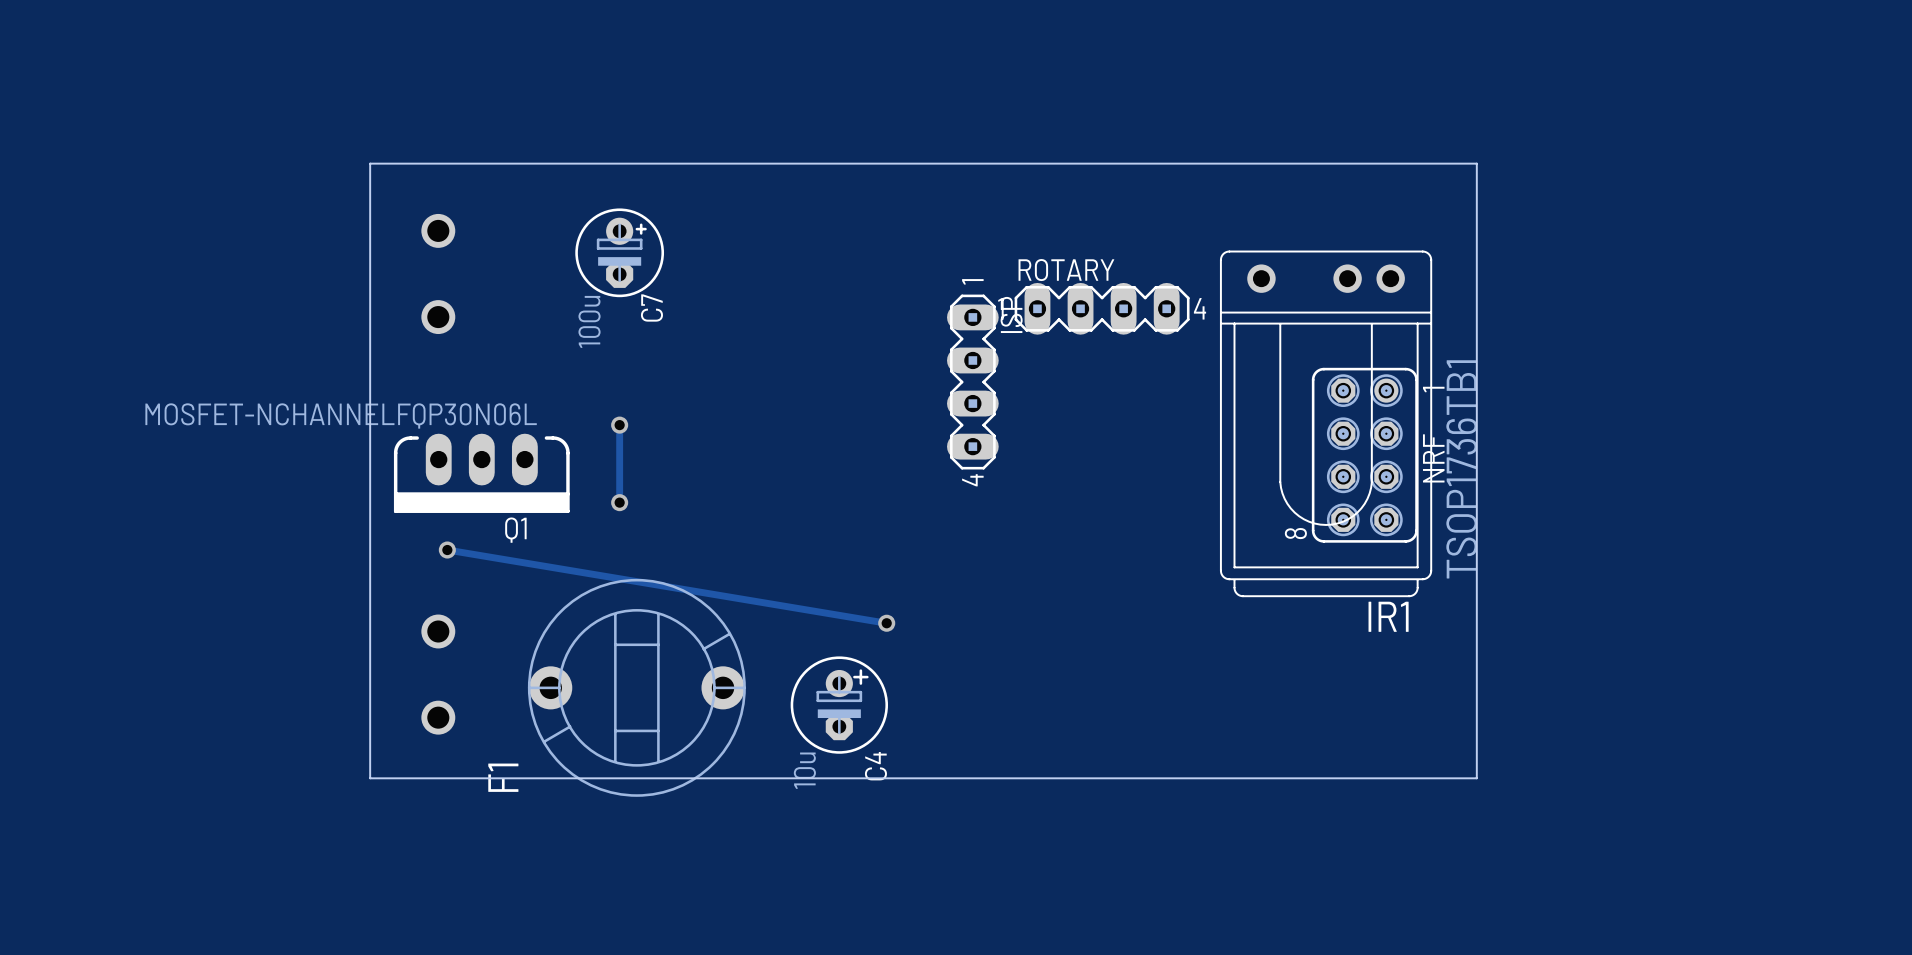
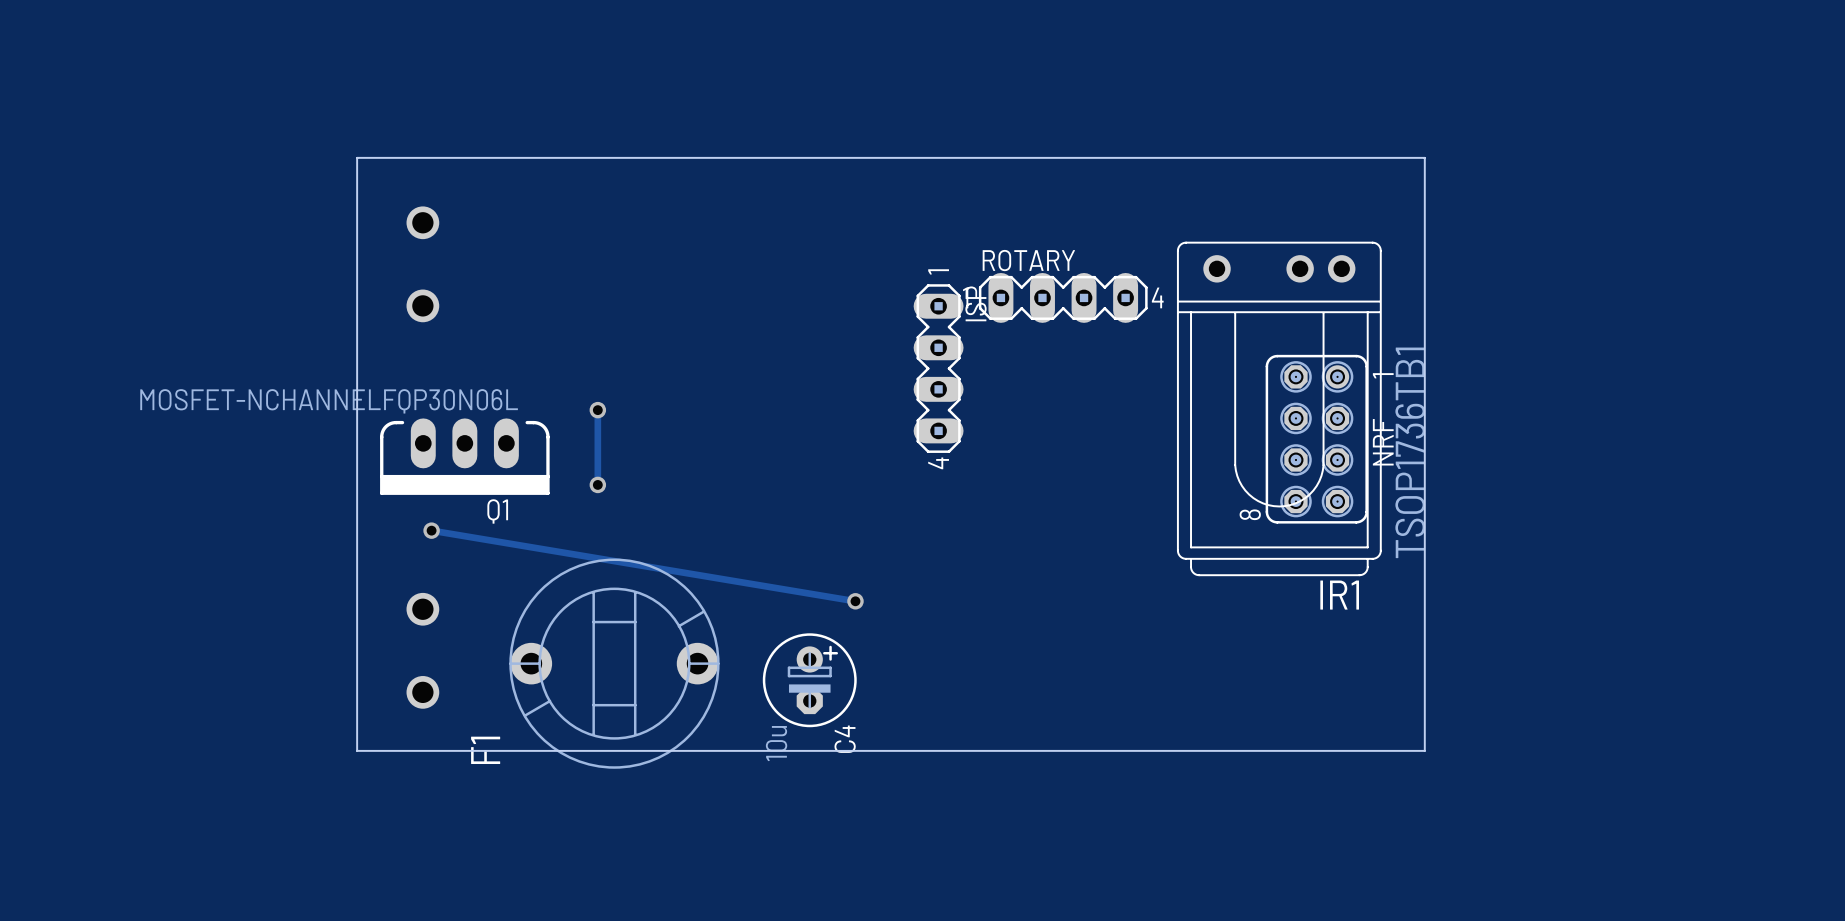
C7: 100u (619, 252) -> none

